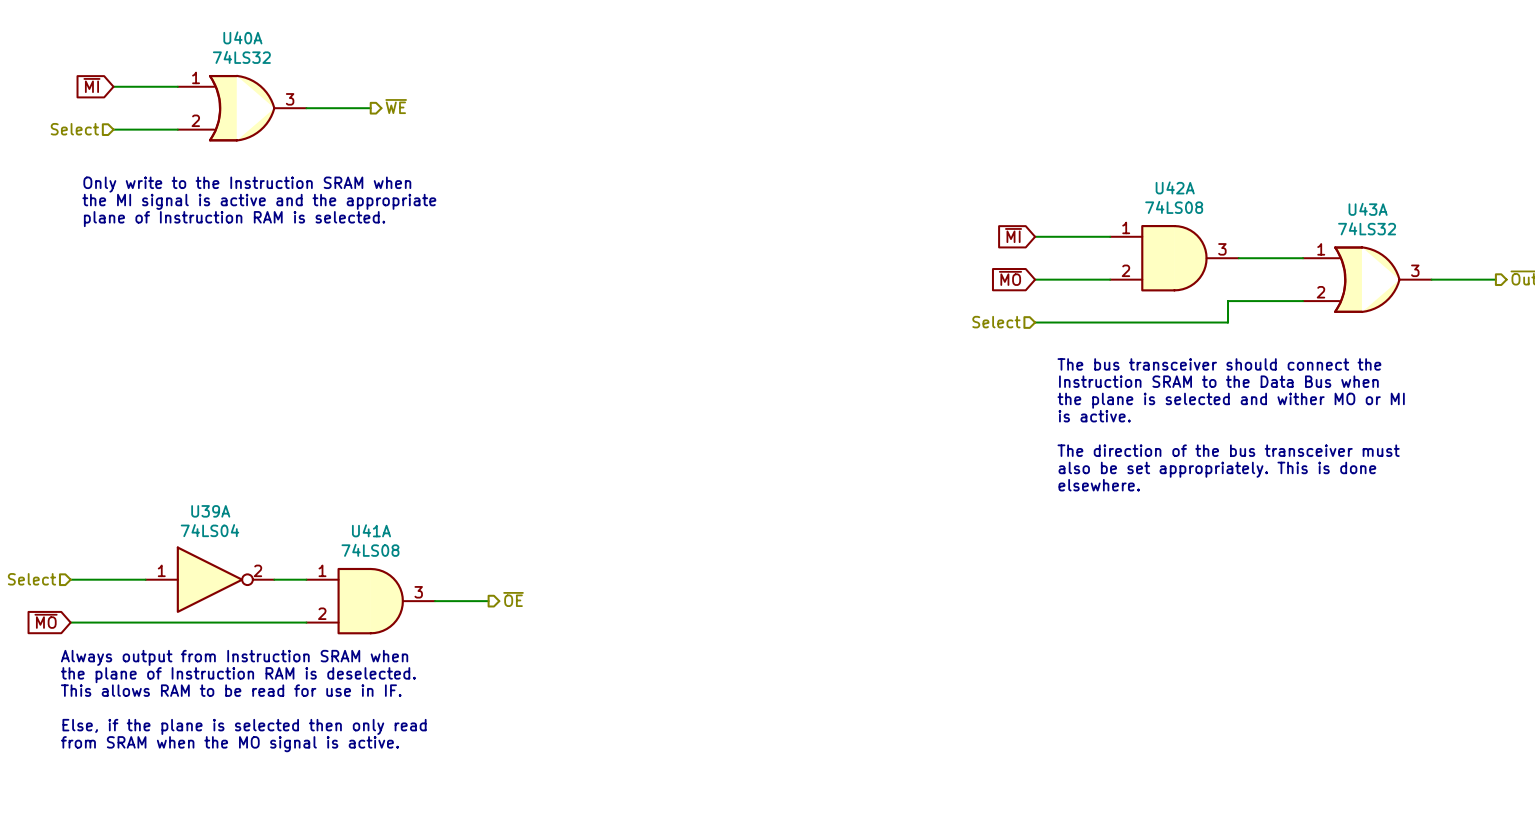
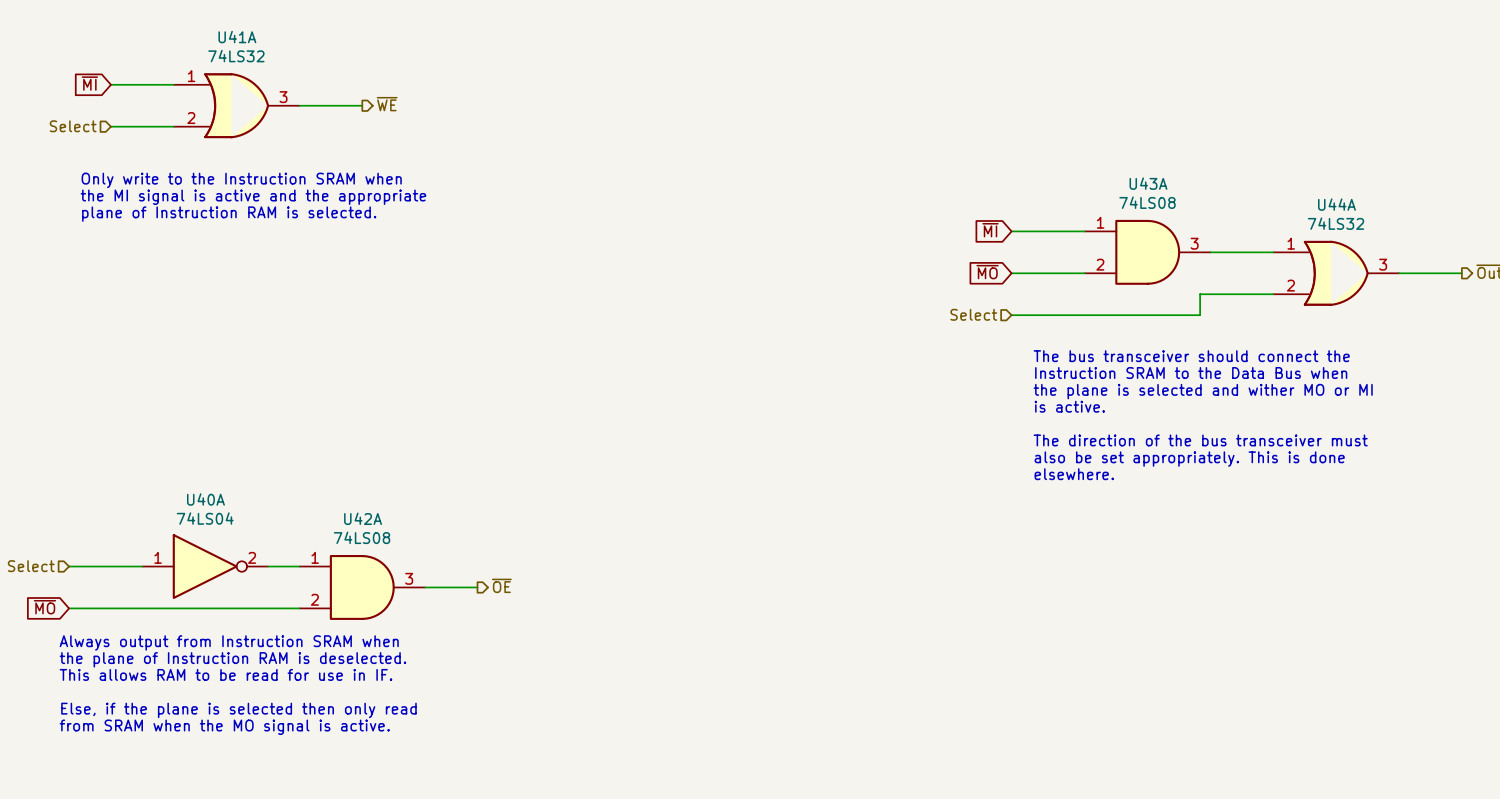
U40A name: U40A (242, 37) -> U41A (237, 37)
U42A name: U42A (1175, 187) -> U43A (1148, 183)
U43A name: U43A (1368, 209) -> U44A (1336, 204)
U39A name: U39A (210, 511) -> U40A (205, 499)
U41A name: U41A (371, 530) -> U42A (363, 518)

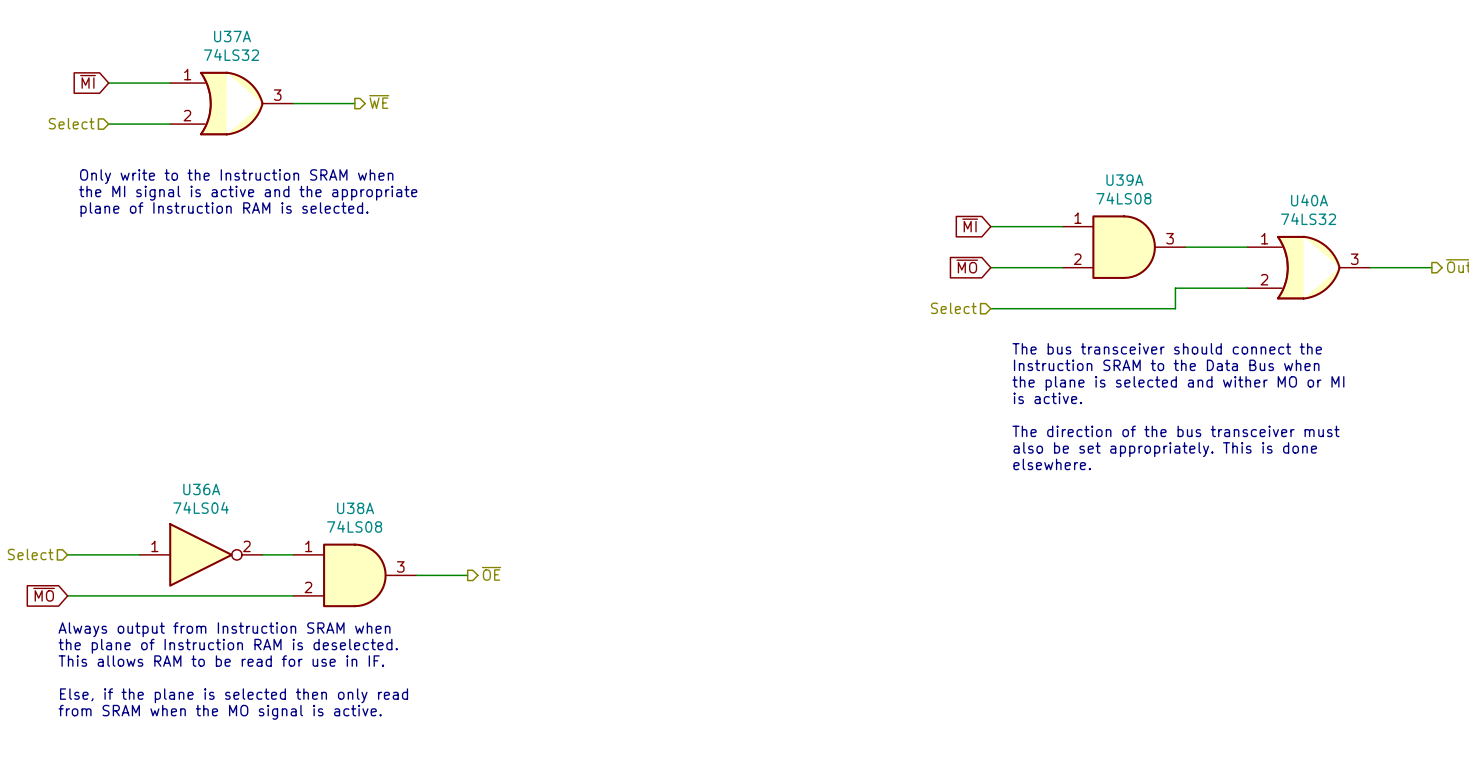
U41A name: U41A (237, 37) -> U37A (232, 36)
U43A name: U43A (1148, 183) -> U39A (1124, 180)
U44A name: U44A (1336, 204) -> U40A (1309, 200)
U40A name: U40A (205, 499) -> U36A (201, 489)
U42A name: U42A (363, 518) -> U38A (355, 508)

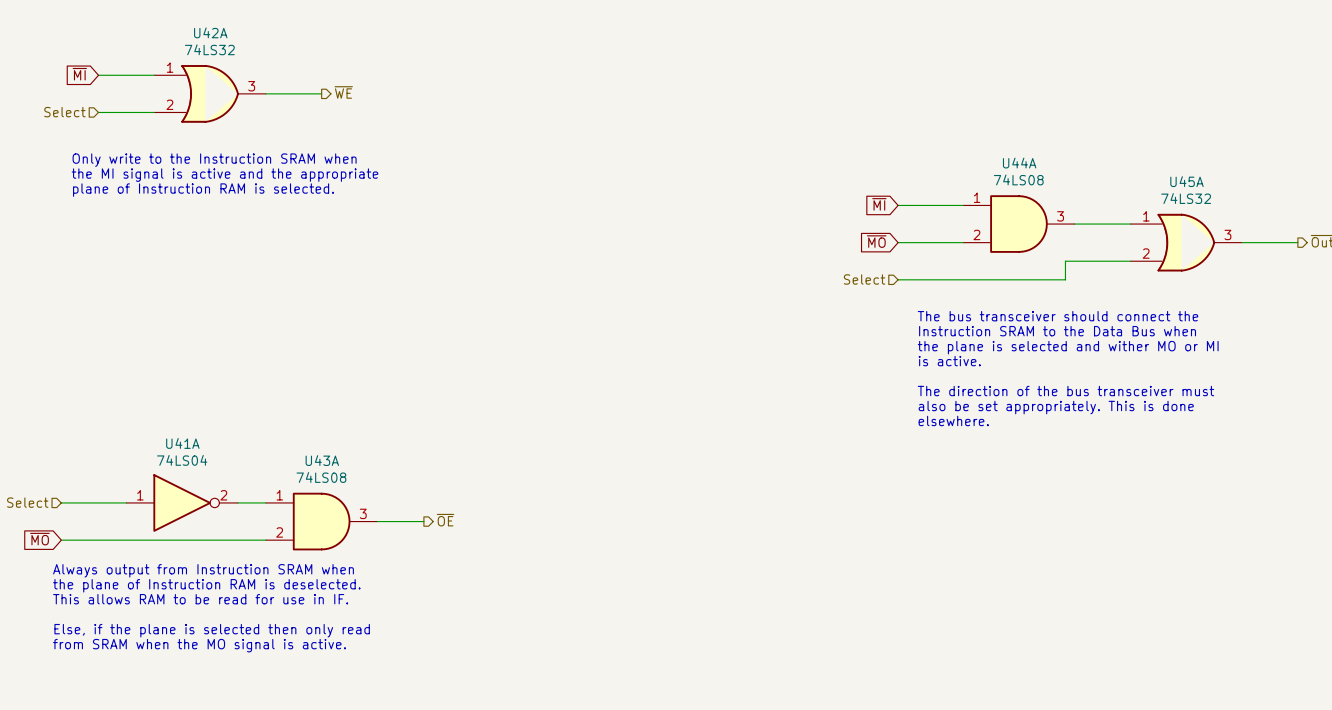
U37A name: U37A (232, 36) -> U42A (210, 32)
U39A name: U39A (1124, 180) -> U44A (1019, 163)
U40A name: U40A (1309, 200) -> U45A (1186, 181)
U36A name: U36A (201, 489) -> U41A (182, 443)
U38A name: U38A (355, 508) -> U43A (322, 460)

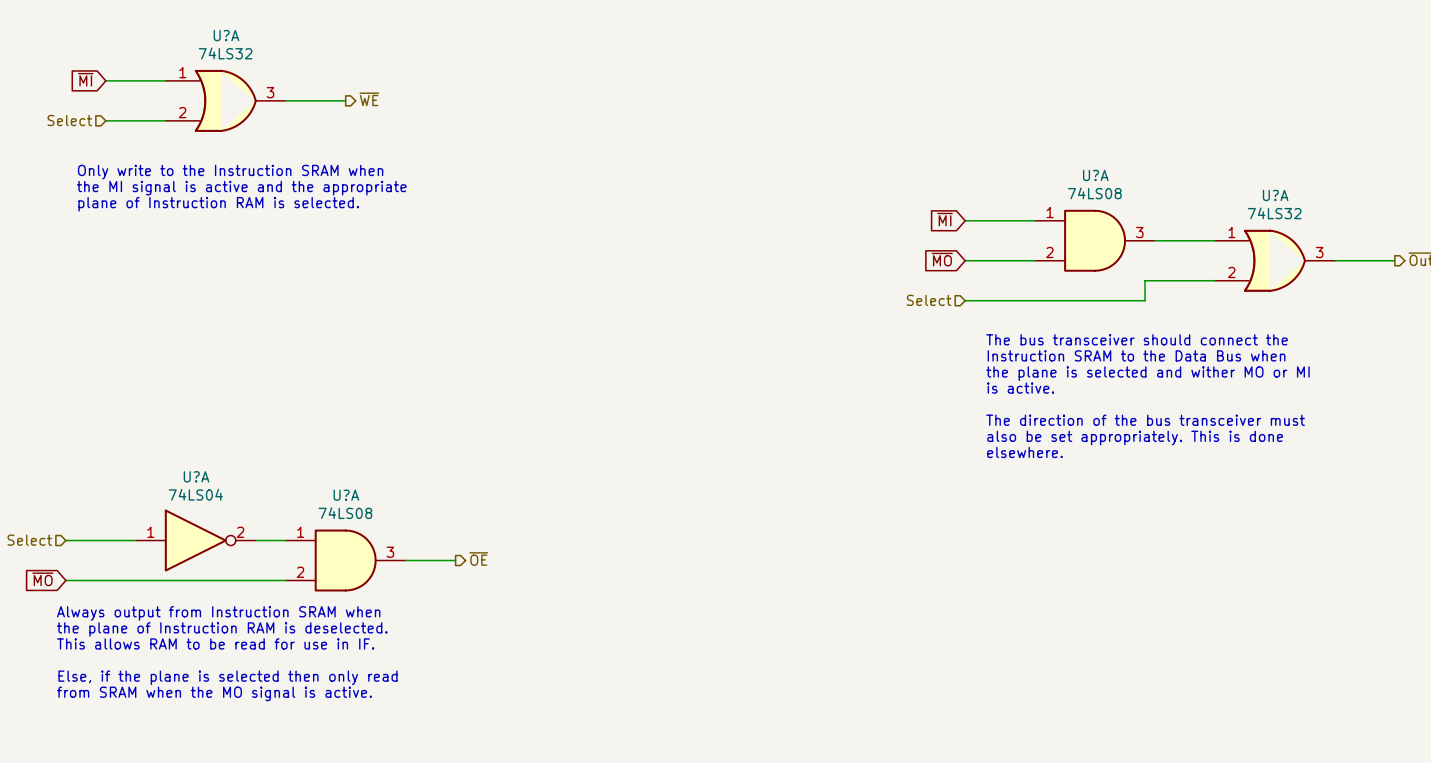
U42A name: U42A (210, 32) -> U?A (226, 35)
U44A name: U44A (1019, 163) -> U?A (1095, 175)
U45A name: U45A (1186, 181) -> U?A (1275, 195)
U41A name: U41A (182, 443) -> U?A (196, 476)
U43A name: U43A (322, 460) -> U?A (346, 495)

